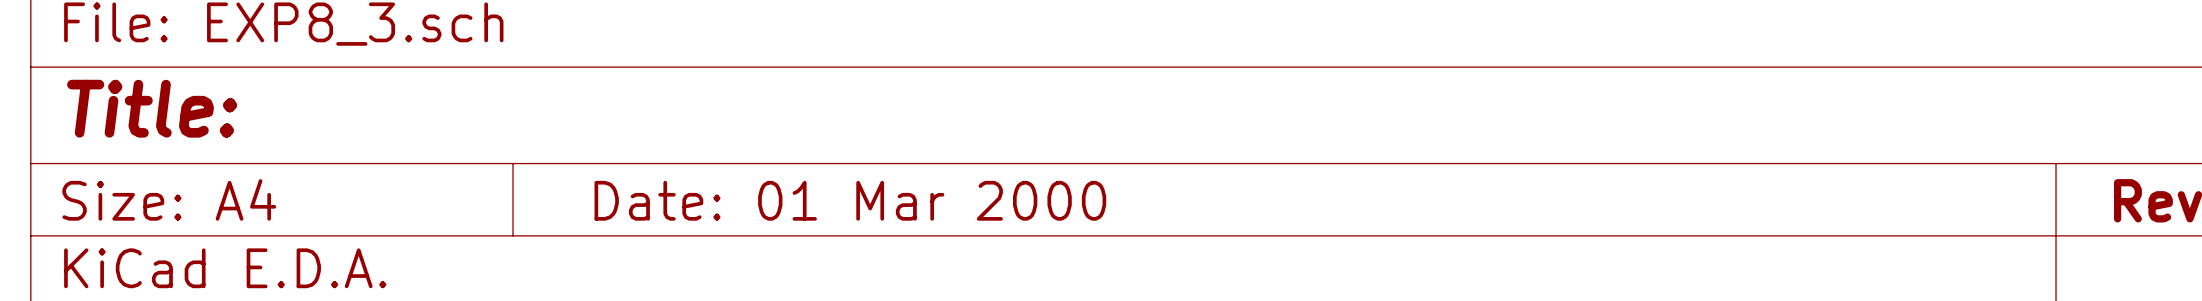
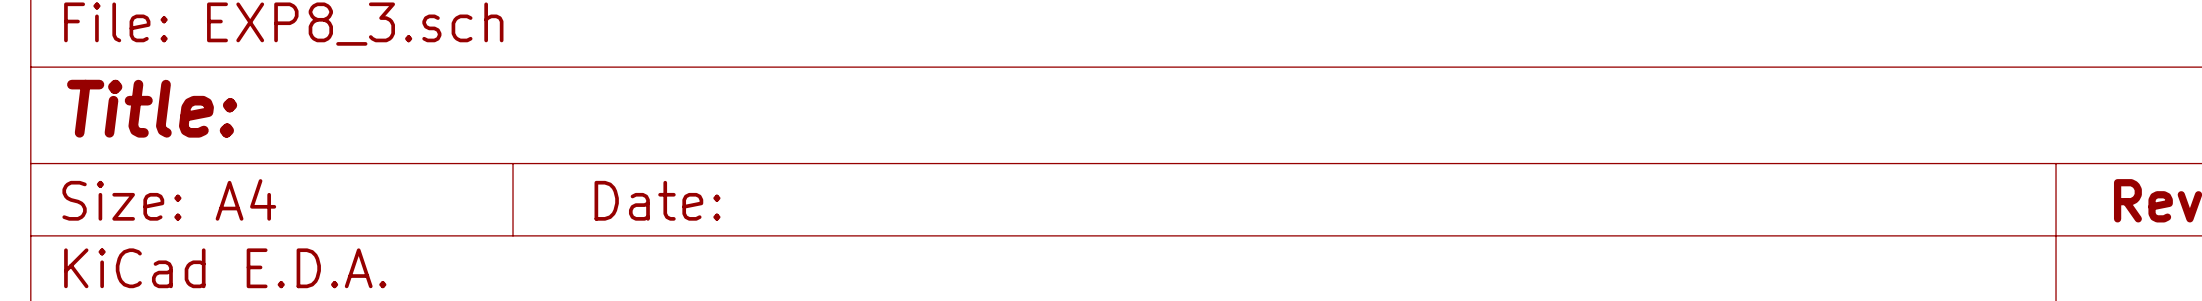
title block: Date: 01 Mar 2000 (850, 200) -> Date: (657, 200)

